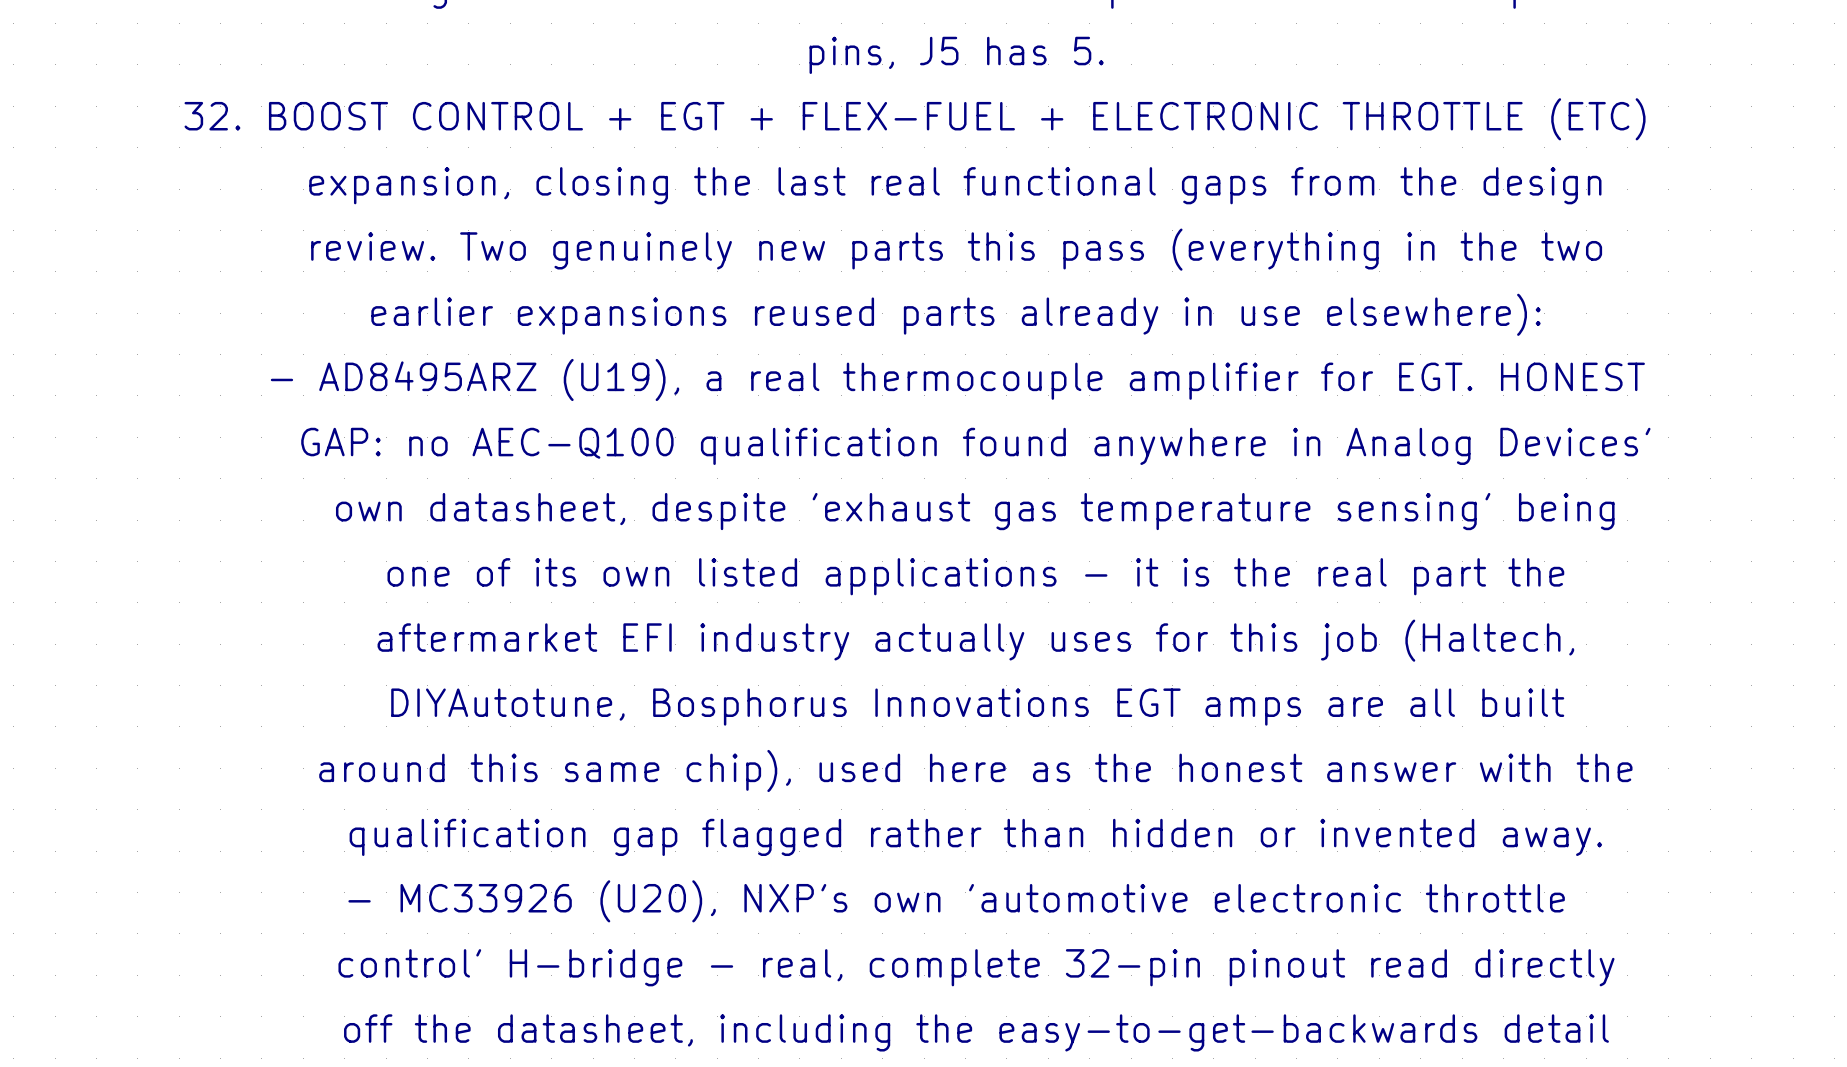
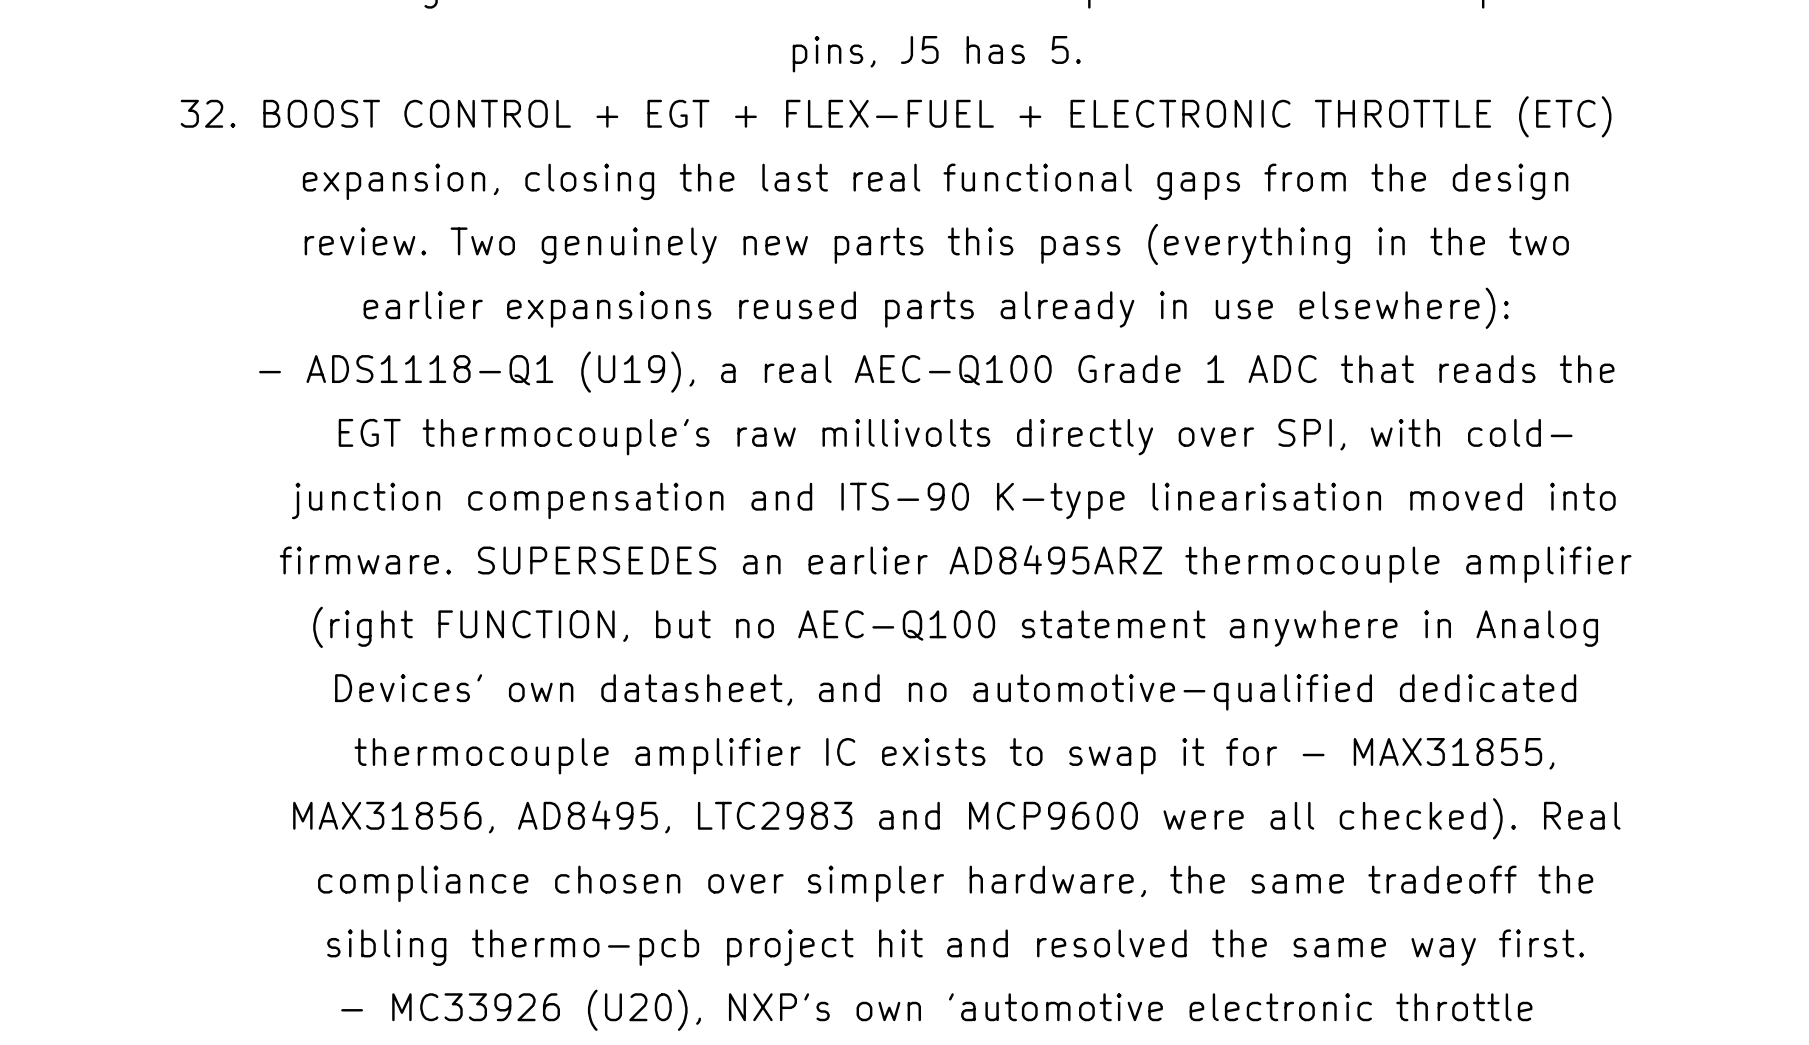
text: - AD8495ARZ (U19), a real thermocouple amplifier for EGT. HONEST (957, 379) -> - ADS1118-Q1 (U19), a real AEC-Q100 Grade 1 ADC that reads the (936, 372)
text: GAP: no AEC-Q100 qualification found anywhere in Analog Devices' (975, 446) -> EGT thermocouple's raw millivolts directly over SPI, with cold- (955, 437)
text: own datasheet, despite 'exhaust gas temperature sensing' being (975, 511) -> junction compensation and ITS-90 K-type linearisation moved into (953, 500)
text: one of its own listed applications - it is the real part the (975, 576) -> firmware. SUPERSEDES an earlier AD8495ARZ thermocouple amplifier (955, 564)
text: aftermarket EFI industry actually uses for this job (Haltech, (975, 640) -> (right FUNCTION, but no AEC-Q100 statement anywhere in Analog (955, 627)
text: DIYAutotune, Bosphorus Innovations EGT amps are all built (977, 707) -> Devices' own datasheet, and no automotive-qualified dedicated (955, 692)
text: around this same chip), used here as the honest answer with the (975, 770) -> thermocouple amplifier IC exists to swap it for - MAX31855, (954, 756)
text: qualification gap flagged rather than hidden or invented away. (975, 837) -> MAX31856, AD8495, LTC2983 and MCP9600 were all checked). Real (956, 818)
text: - MC33926 (U20), NXP's own 'automotive electronic throttle (956, 901) -> compliance chosen over simpler hardware, the same tradeoff the (955, 883)
text: control' H-bridge - real, complete 32-pin pinout read directly (976, 967) -> sibling thermo-pcb project hit and resolved the same way first. (955, 947)
text: off the datasheet, including the easy-to-get-backwards detail (976, 1032) -> - MC33926 (U20), NXP's own 'automotive electronic throttle (936, 1010)

